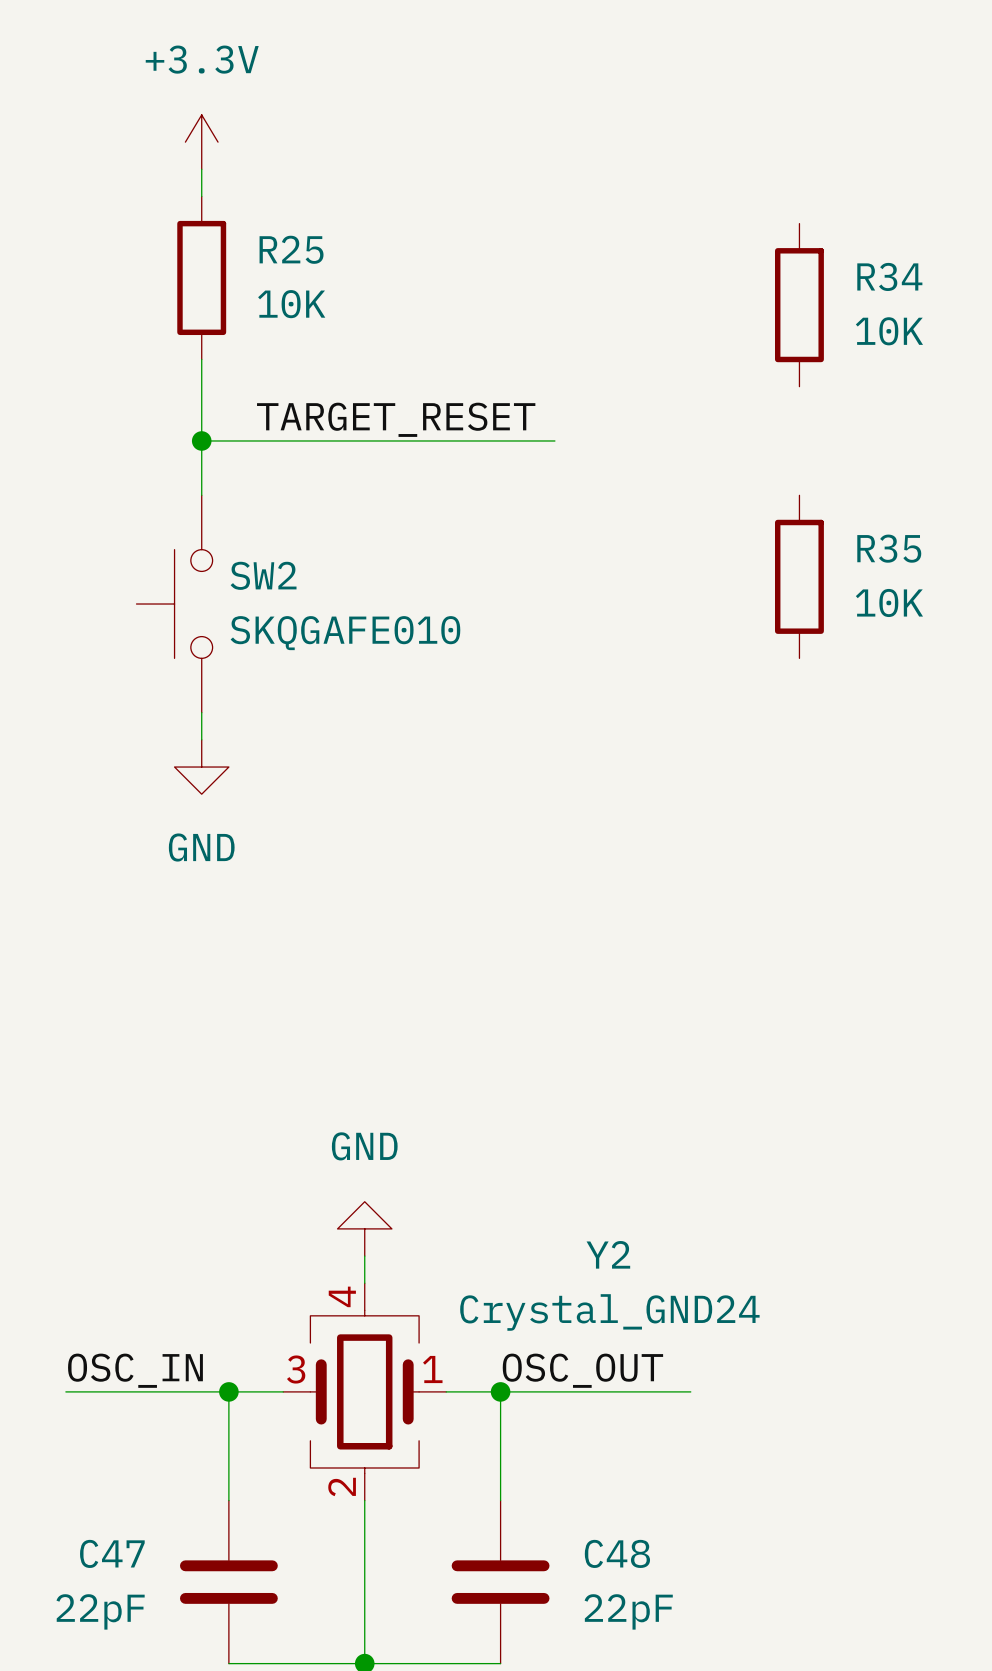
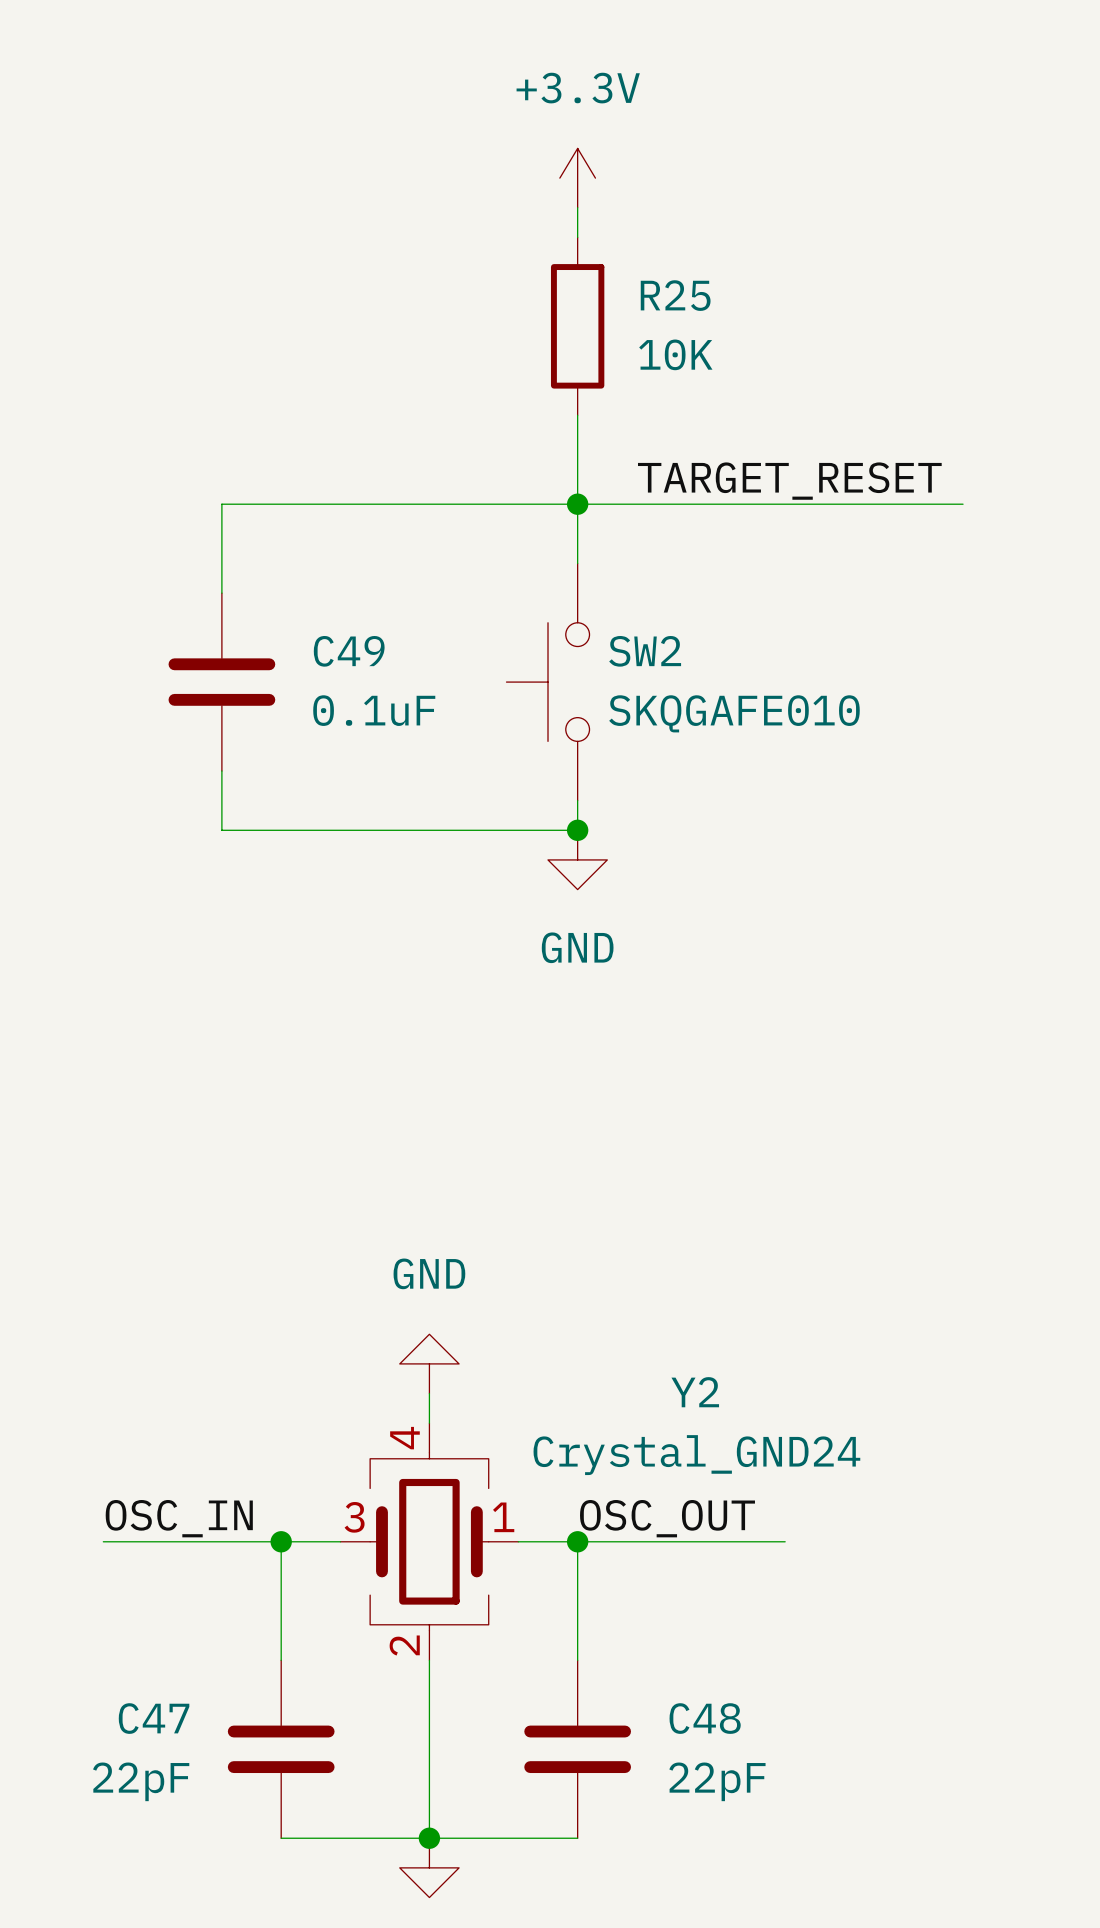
power symbol position: +3.3V (201, 142) -> +3.3V (577, 178)
wire: (201, 169) (201, 196) -> (577, 207) (577, 237)
R25 position: (201, 277) -> (577, 326)
R34: 10K (799, 305) -> none
wire: (201, 359) (201, 495) -> (577, 415) (577, 563)
label position: TARGET_RESET (396, 419) -> TARGET_RESET (789, 481)
wire: none -> (251, 504) (221, 504) (221, 593)
junction: (201, 440) -> none
junction: none -> (577, 504)
wire: none -> (636, 504) (963, 504)
R35: 10K (799, 576) -> none
SW2 position: (174, 604) -> (548, 682)
C49: none -> 0.1uF (221, 682)
wire: none -> (221, 771) (221, 830) (577, 830) (577, 800)
wire: (201, 712) (201, 739) -> none
junction: none -> (577, 830)
power symbol position: GND (201, 767) -> GND (577, 859)

